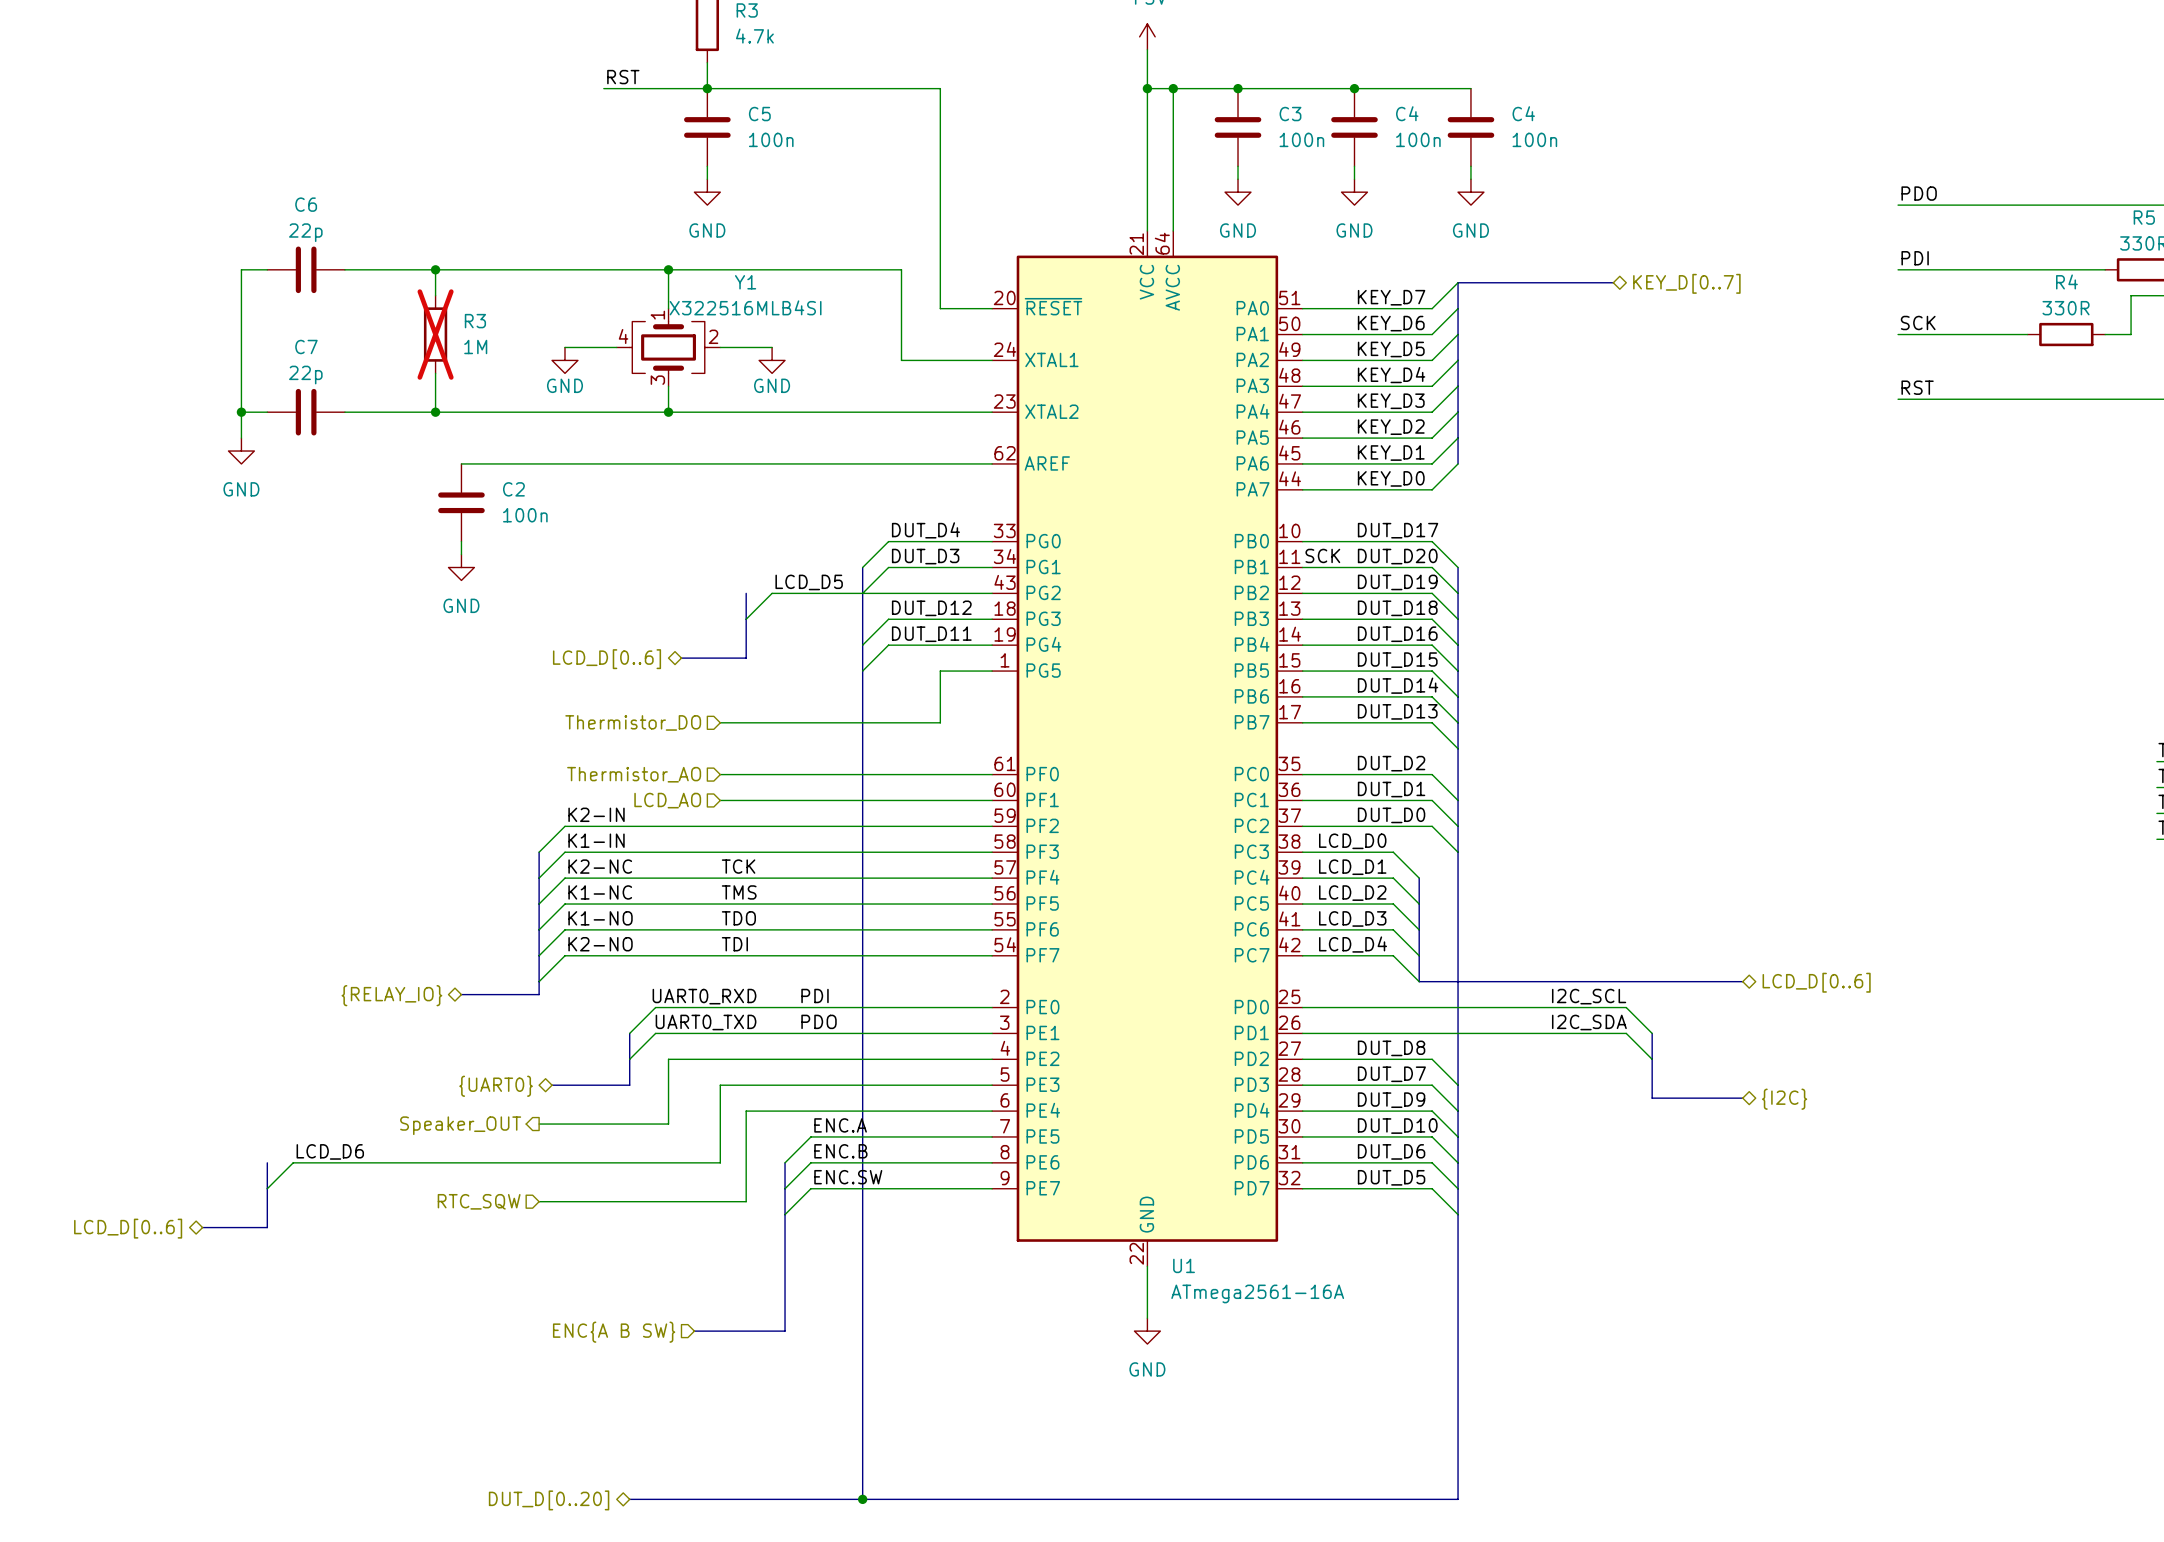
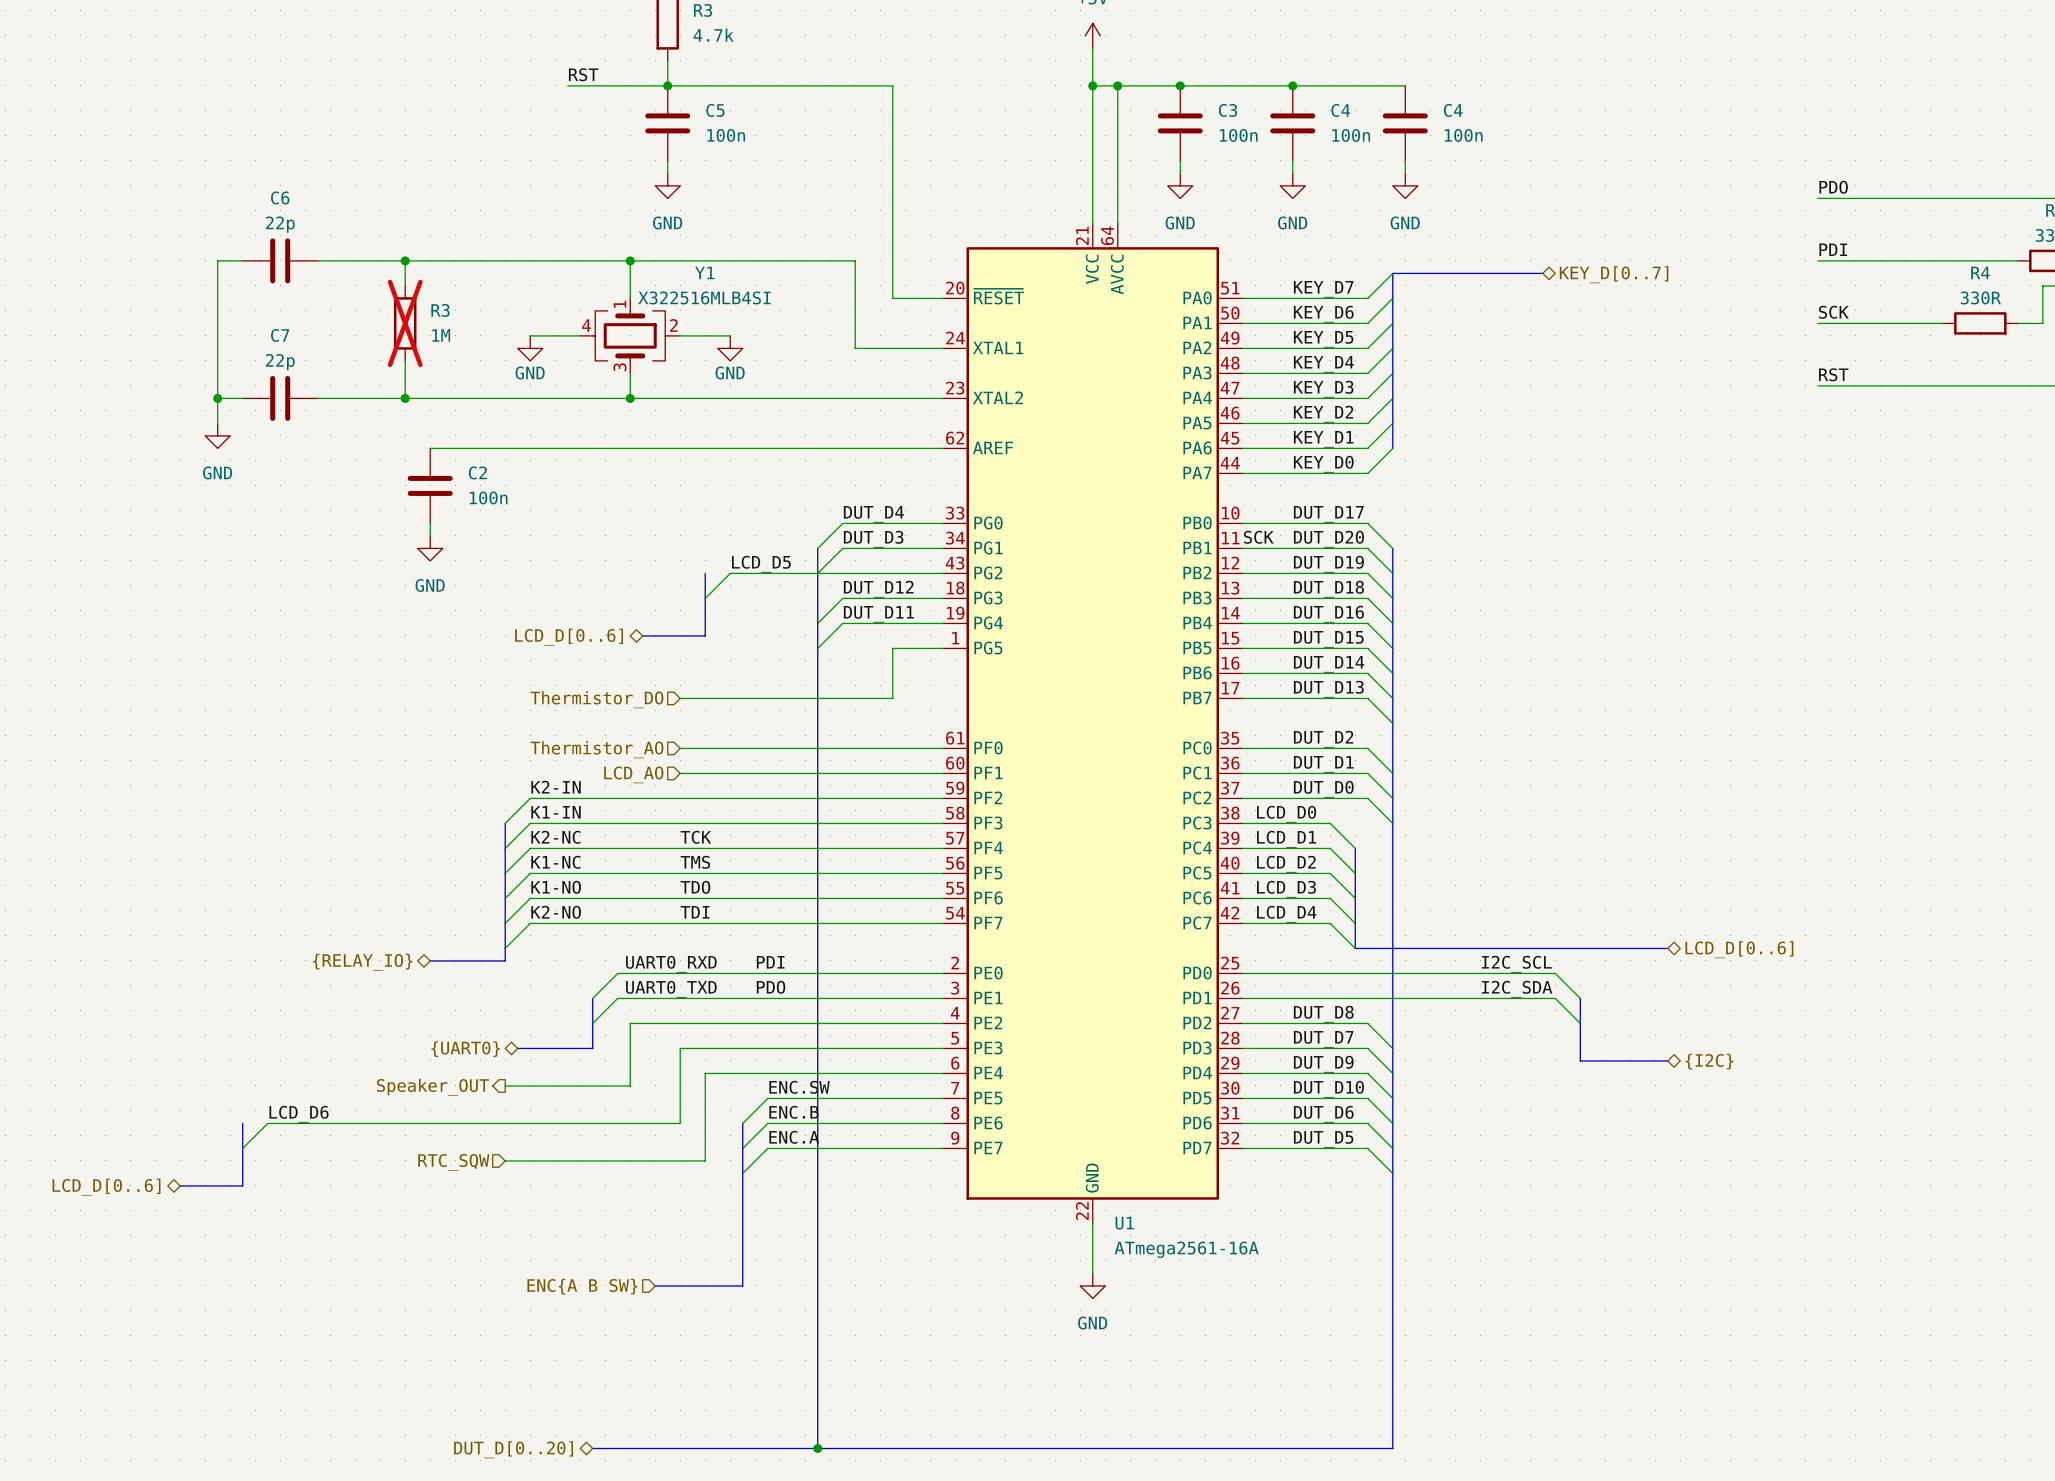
label: ENC.A (840, 1125) -> ENC.SW (799, 1087)
label: ENC.SW (848, 1177) -> ENC.A (794, 1137)

